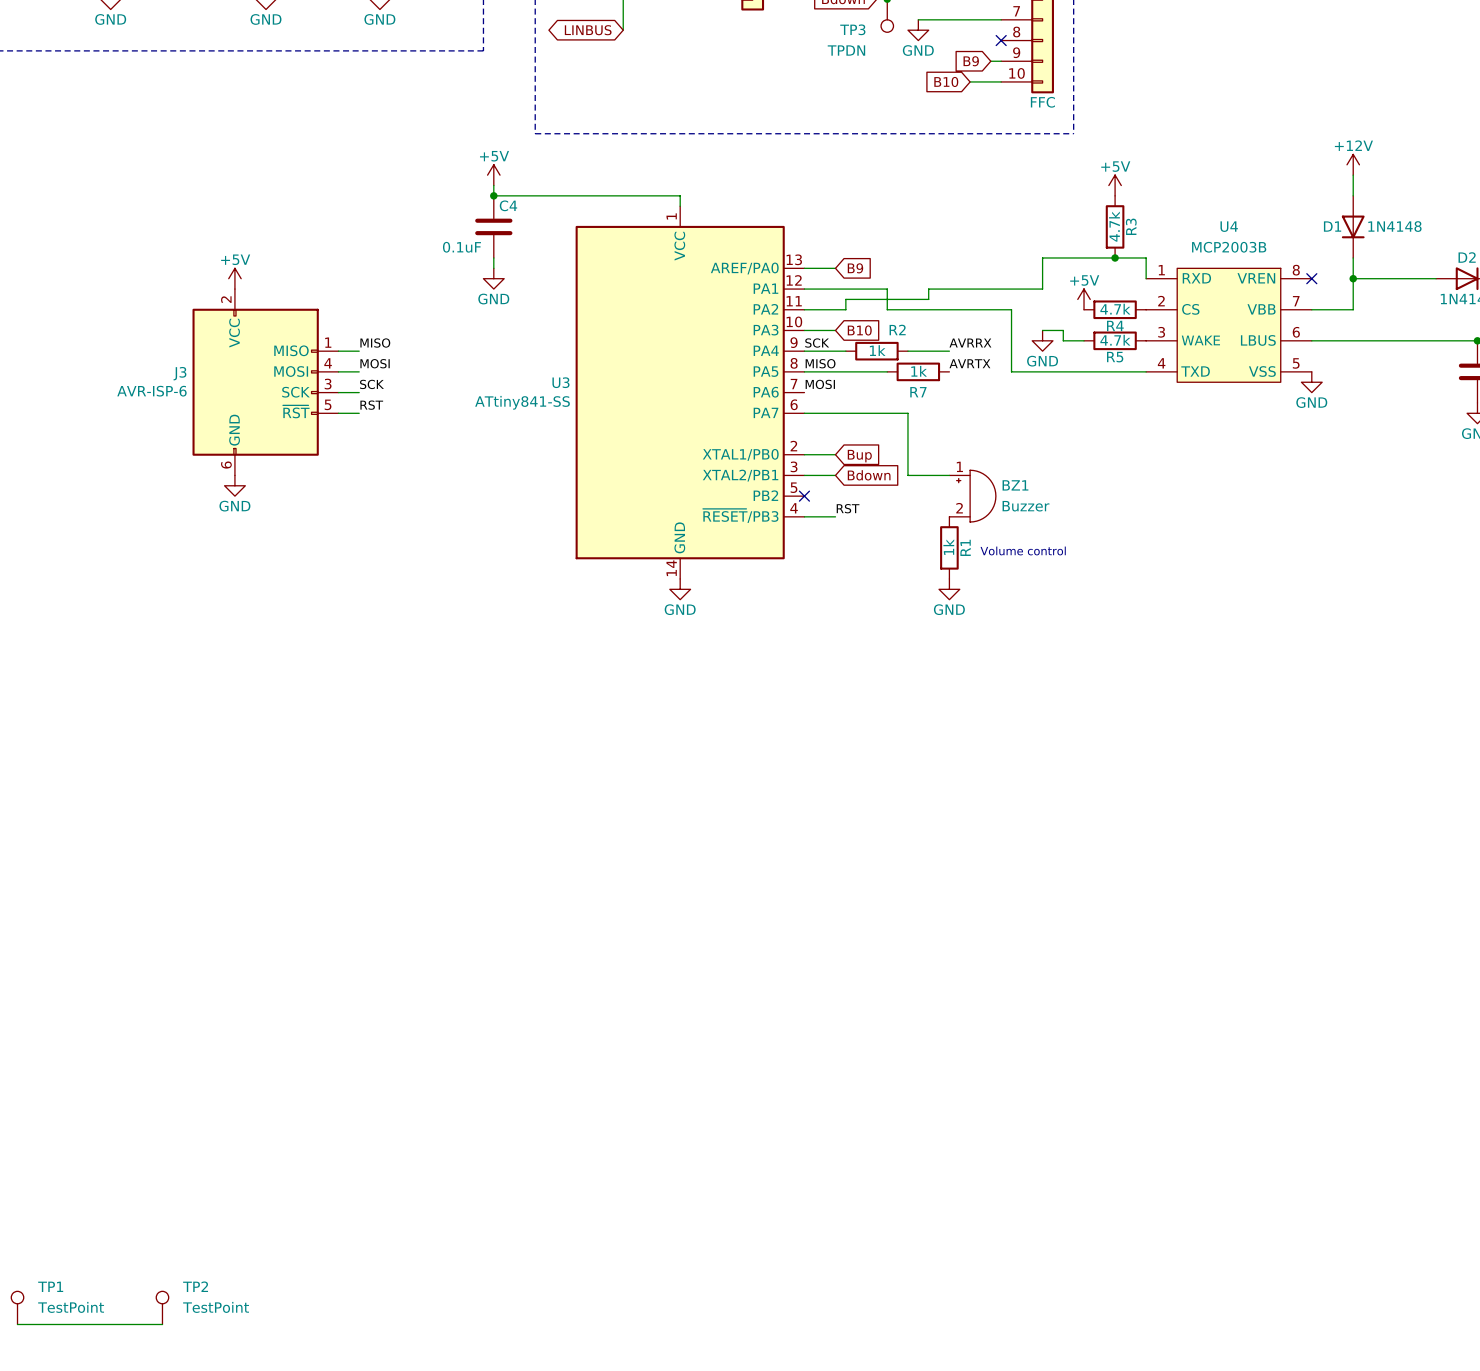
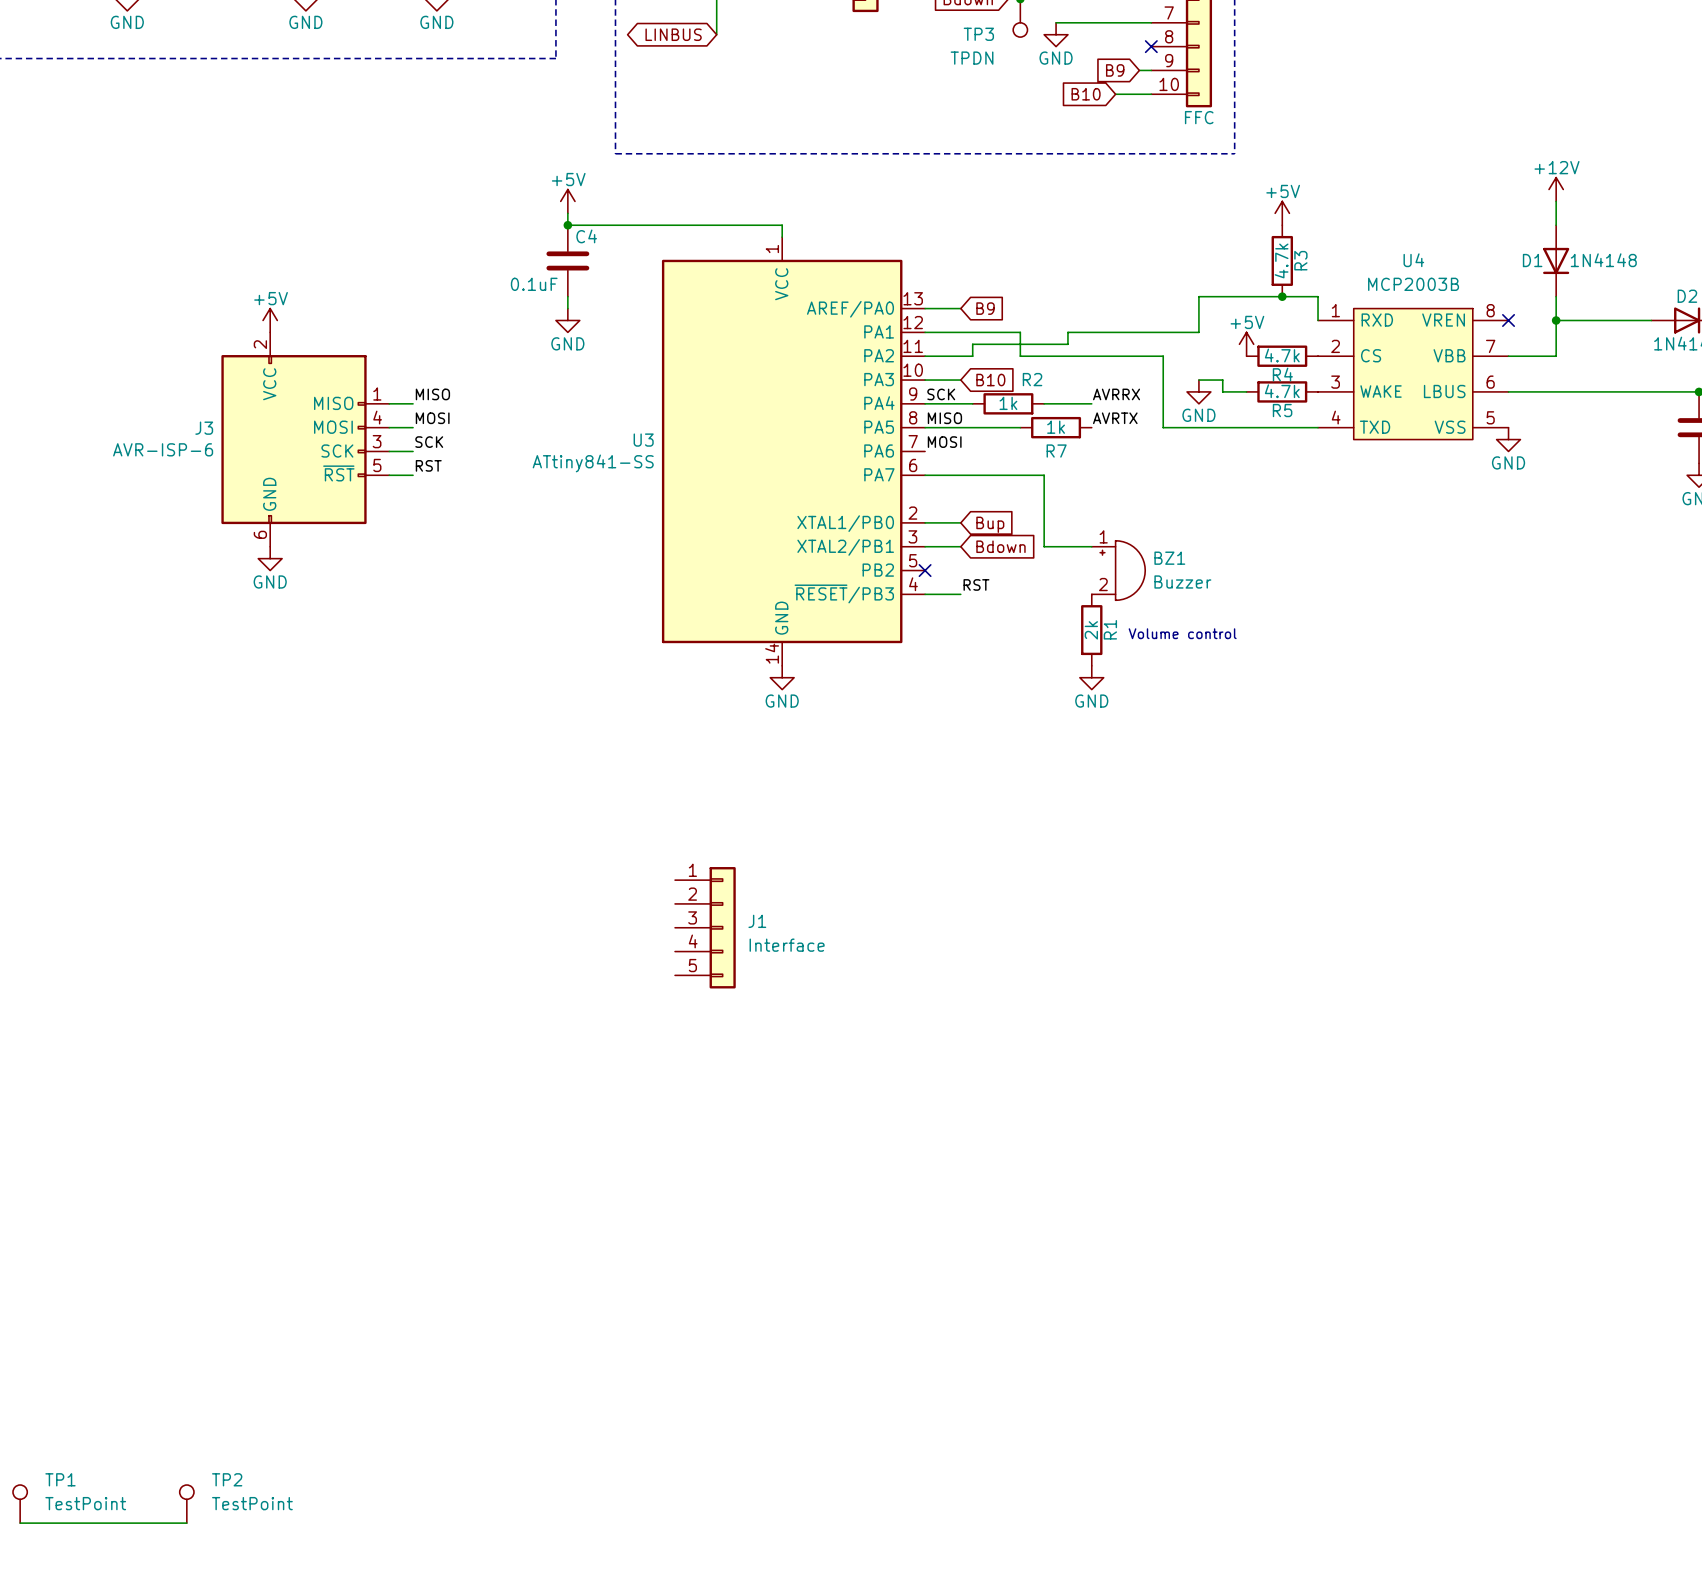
R1 value: 1k (948, 547) -> 2k (1091, 630)
J1: none -> Interface (705, 927)

